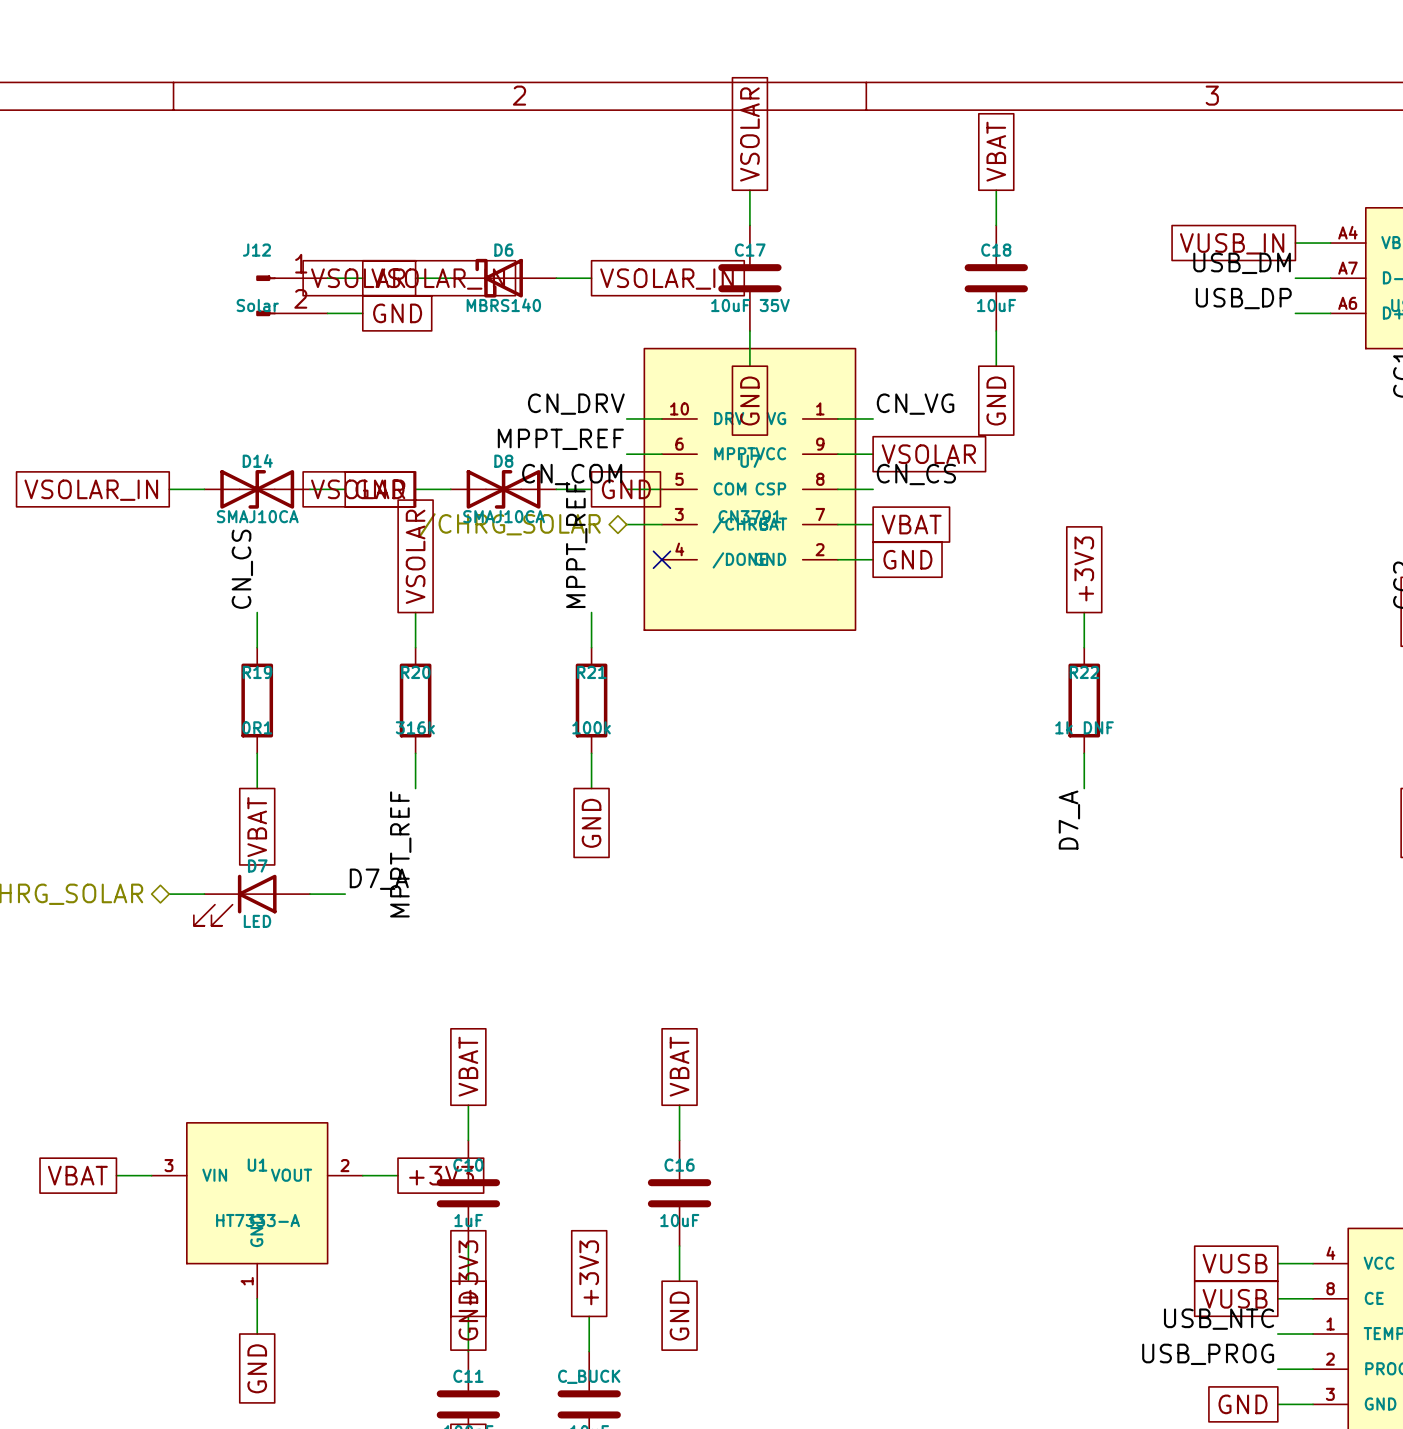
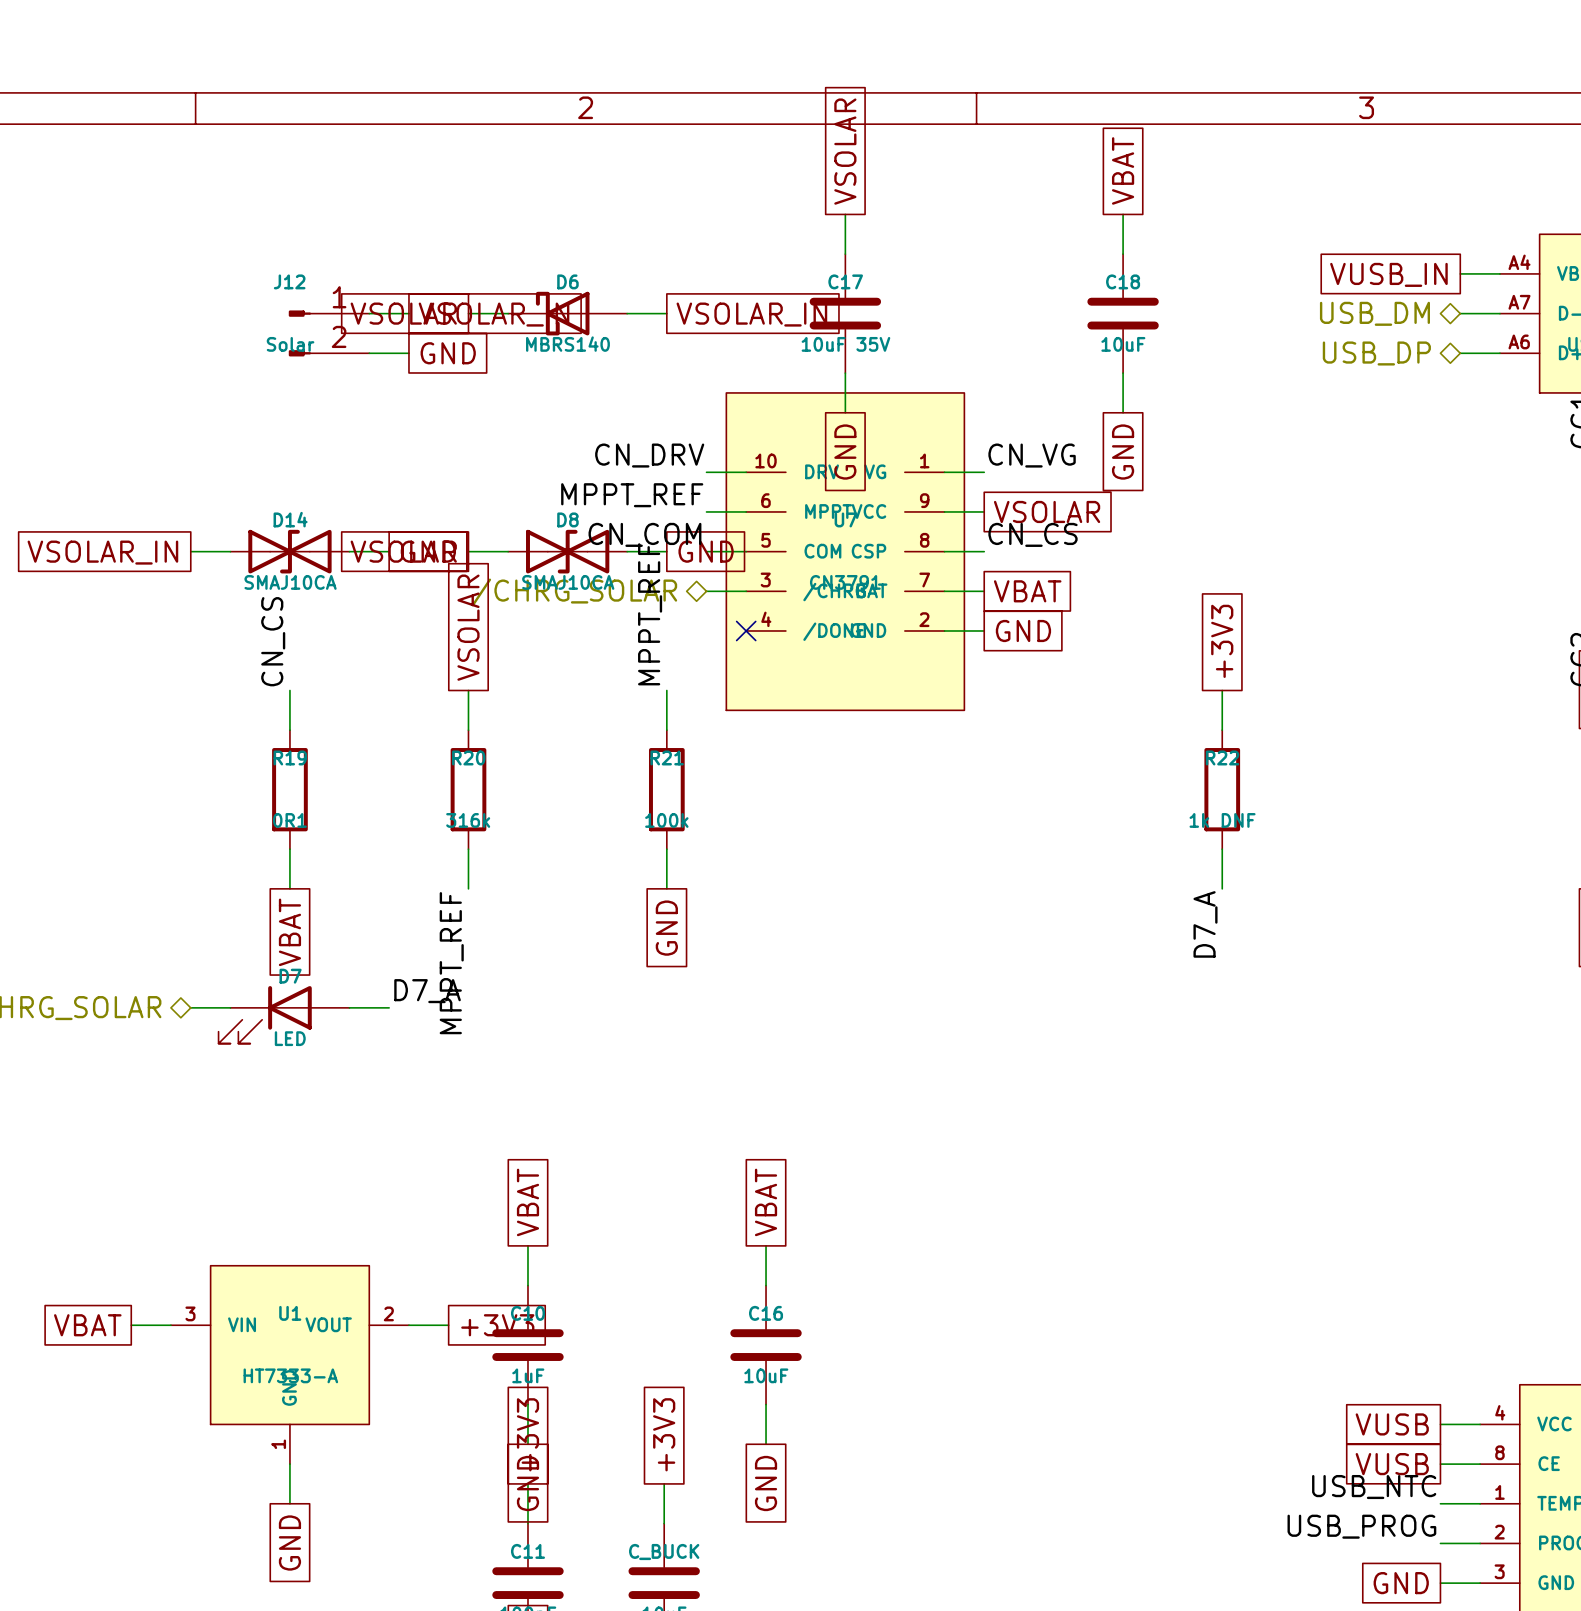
label: USB_DM (1242, 263) -> none
hierarchical label: none -> USB_DM (1374, 313)
label: USB_DP (1243, 298) -> none
hierarchical label: none -> USB_DP (1376, 353)

